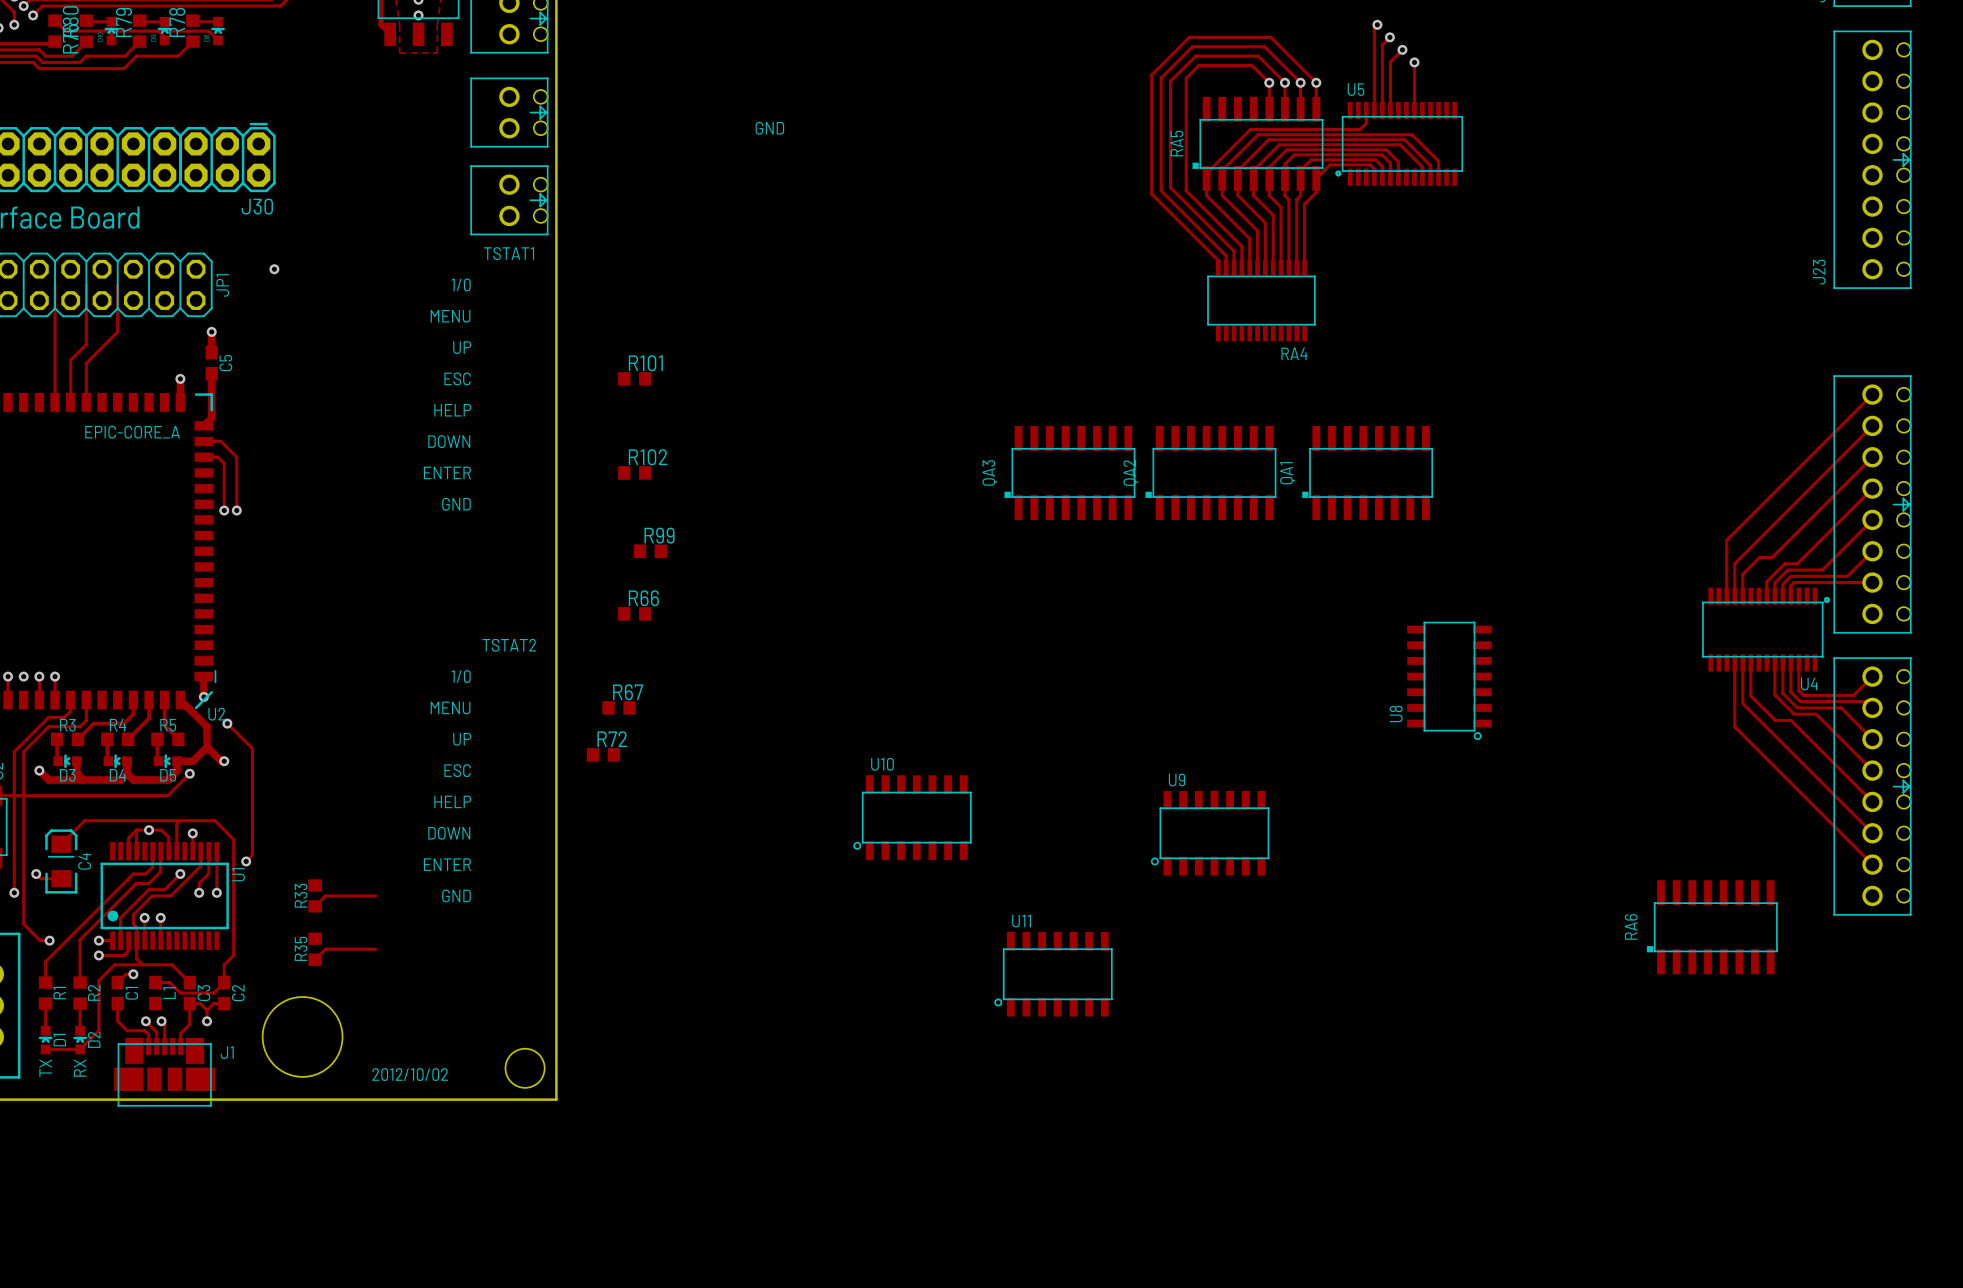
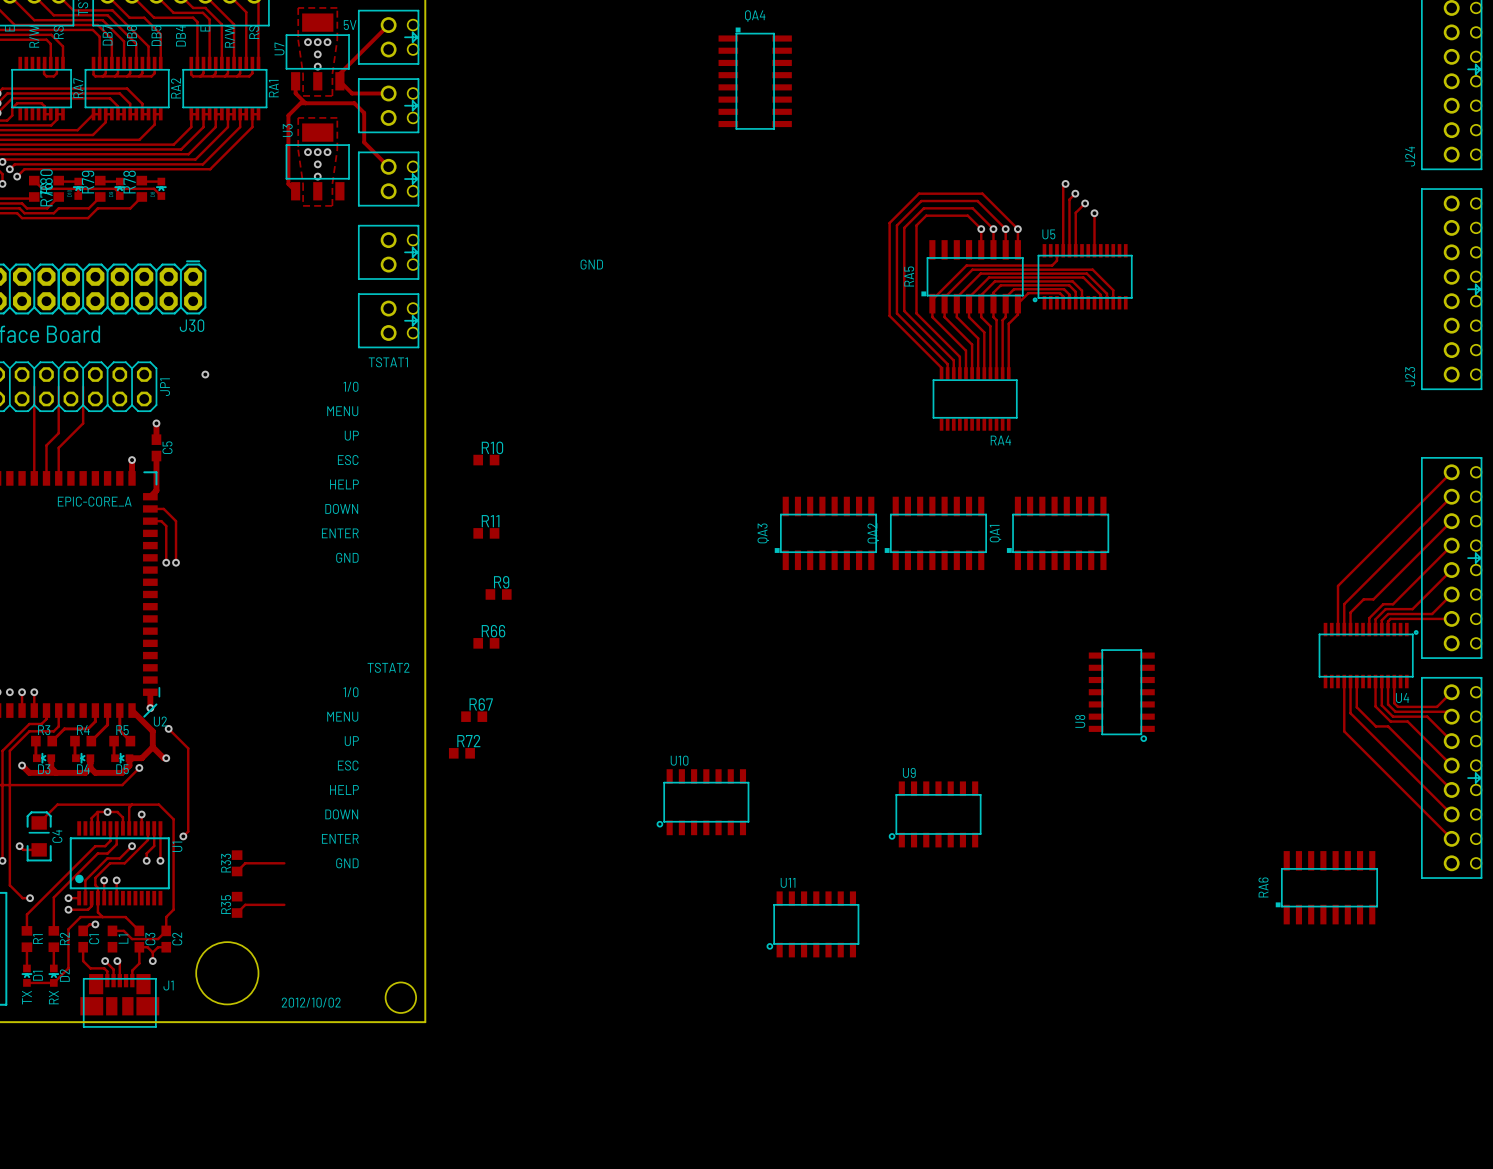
R101 name: R101 (645, 363) -> R10 (492, 447)
R102 name: R102 (648, 457) -> R11 (490, 521)
R99 name: R99 (659, 535) -> R9 (501, 582)

